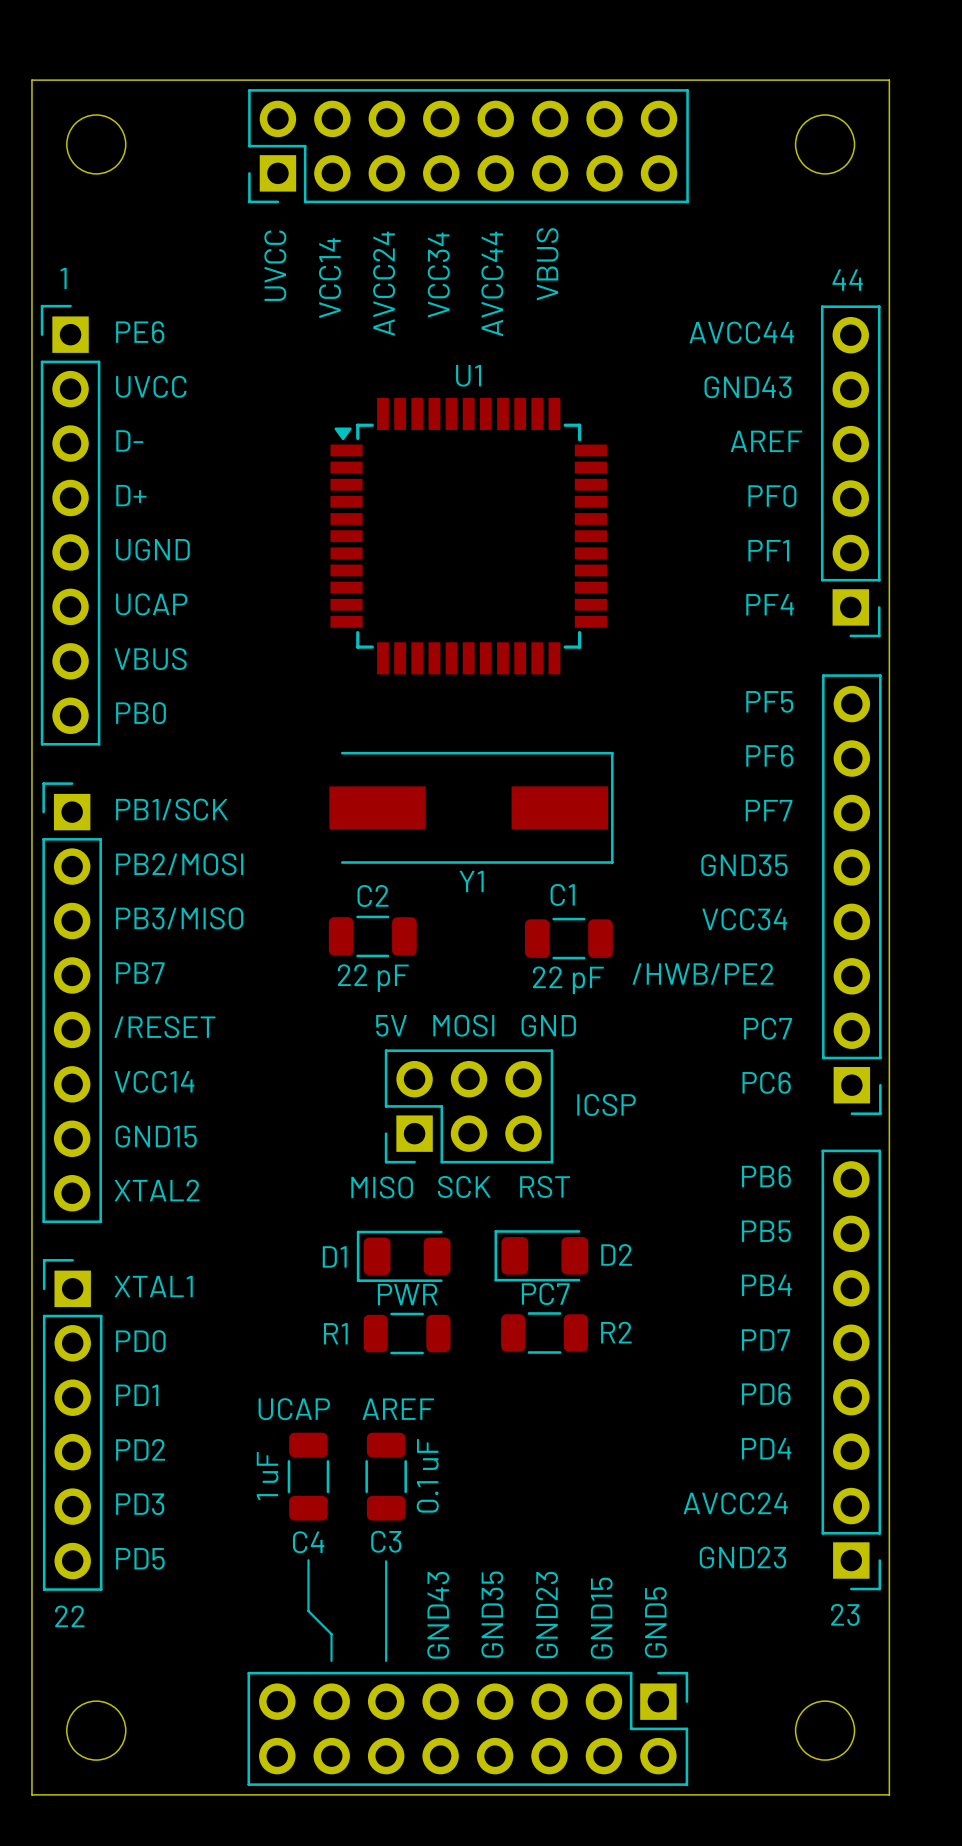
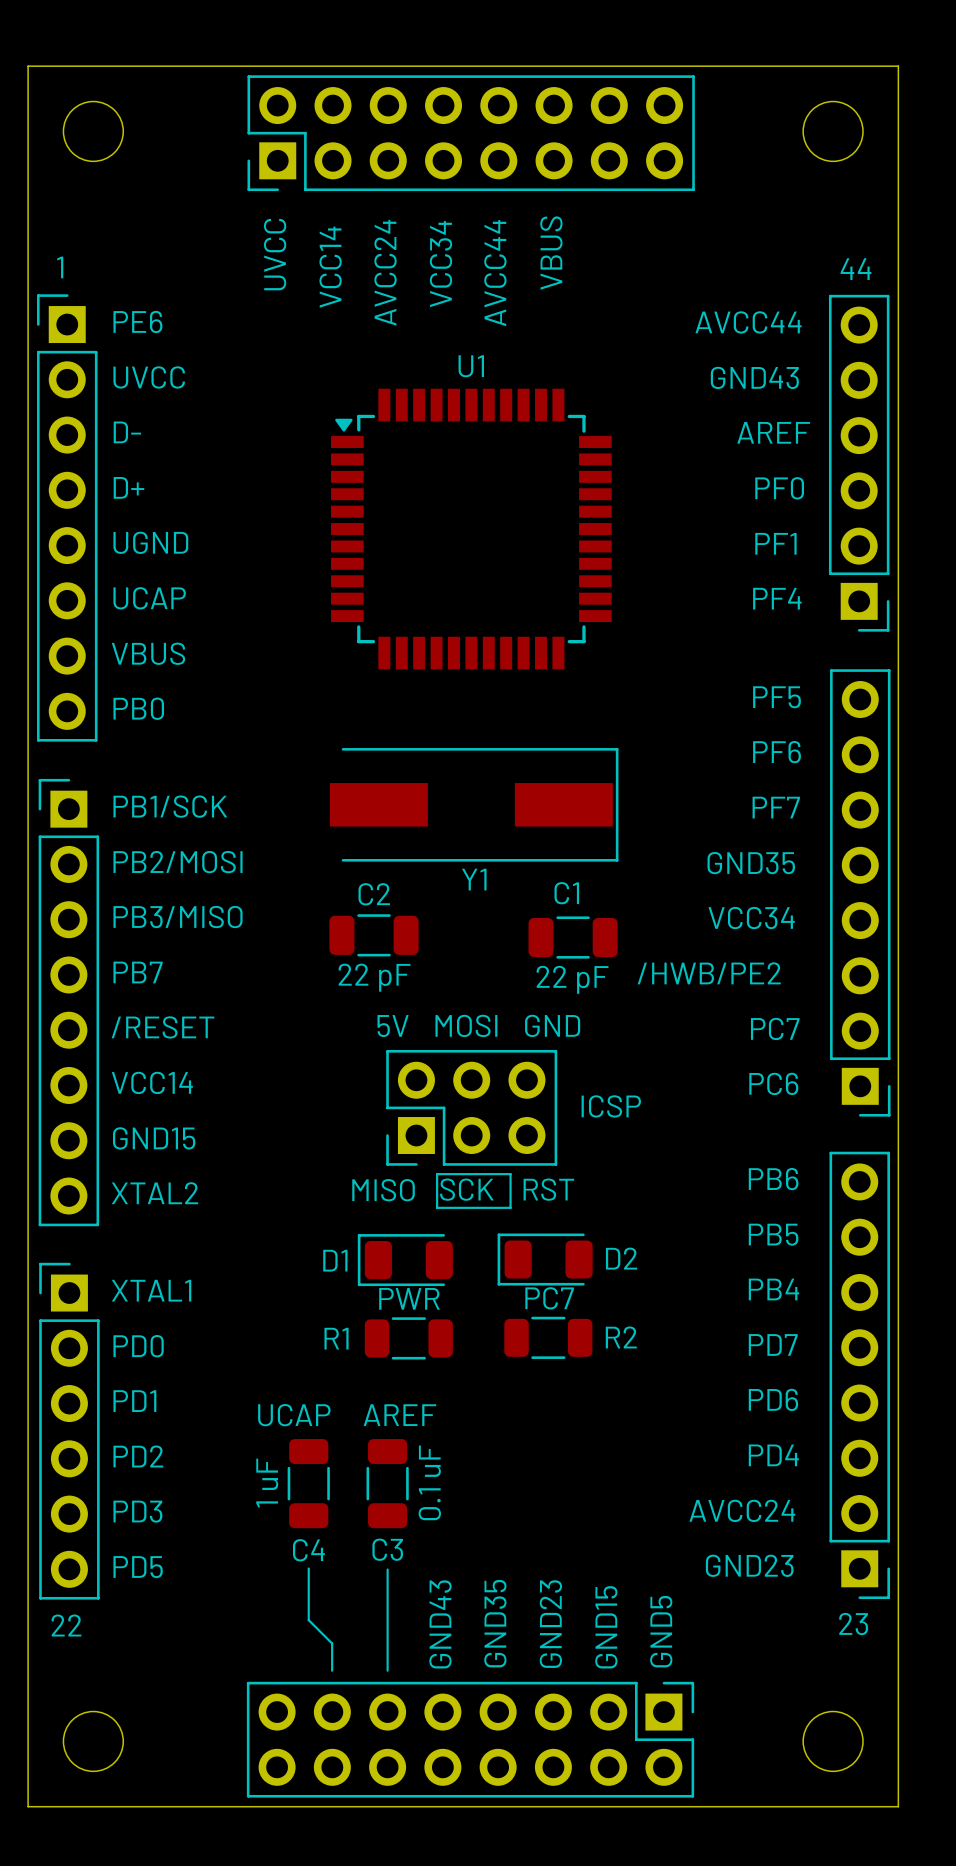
line: none -> (437, 1174) (510, 1174) (510, 1207) (437, 1207) (437, 1174)

